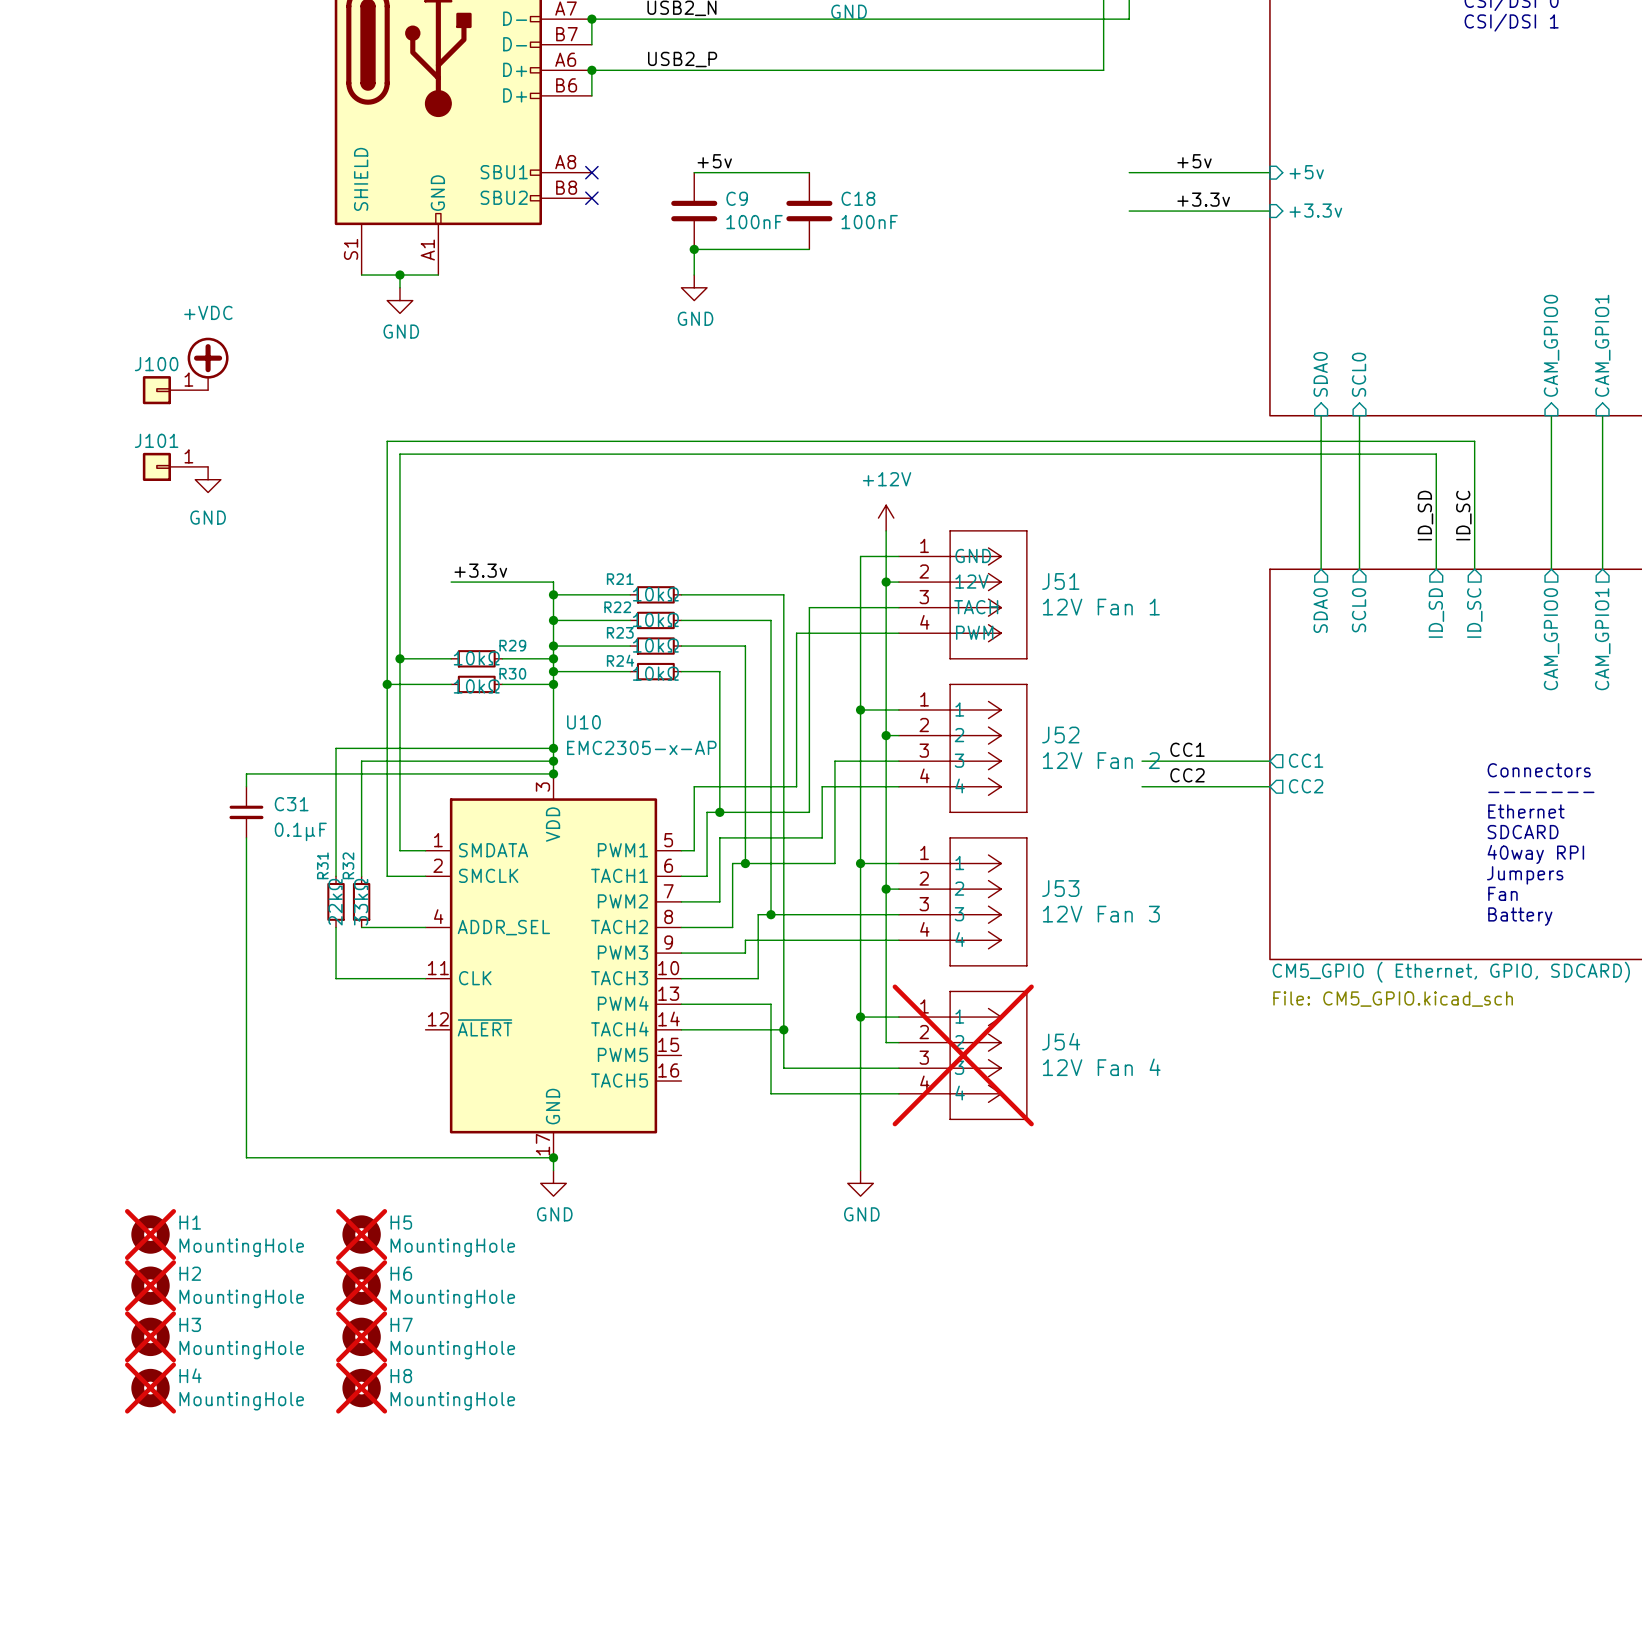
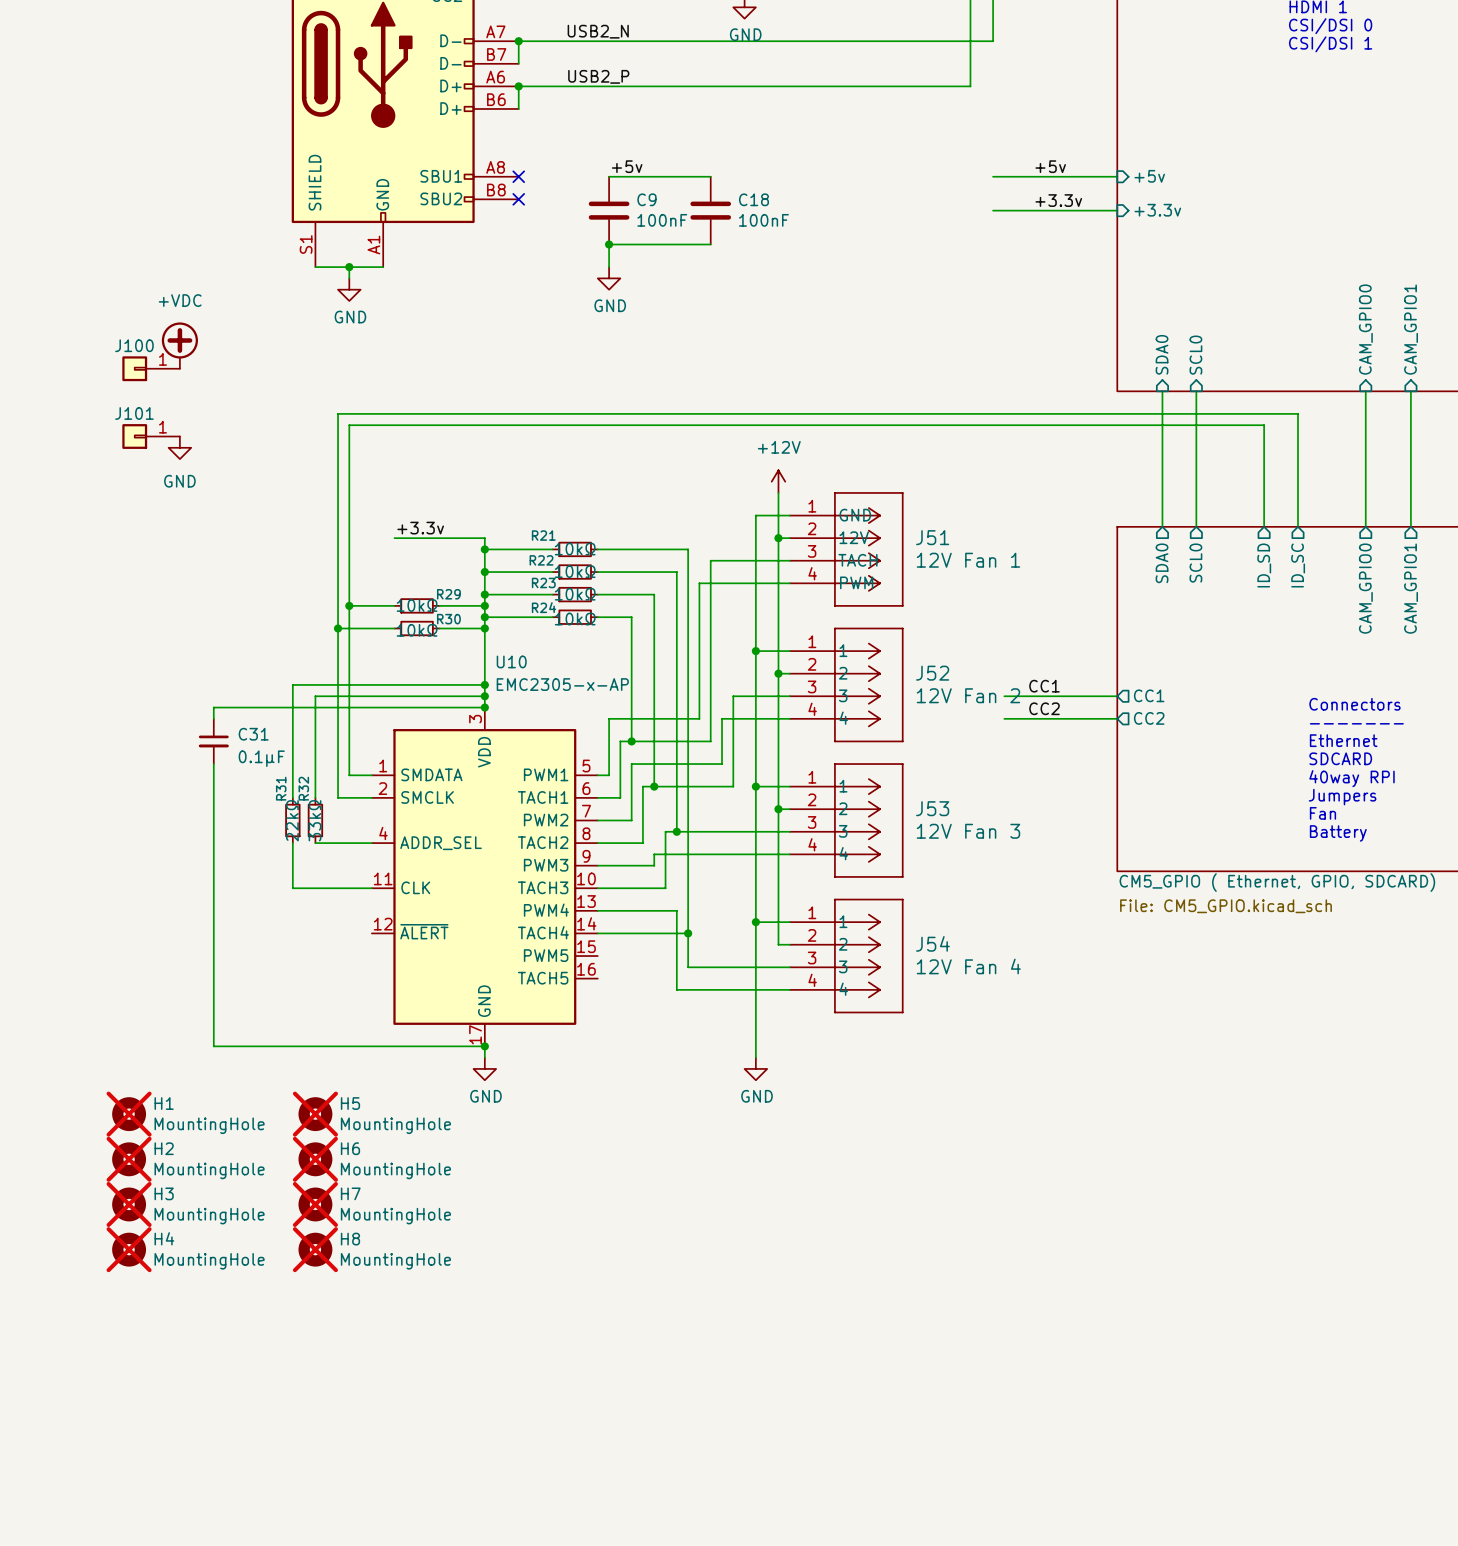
label: ID_SD (1425, 515) -> none
label: ID_SC (1463, 515) -> none
J54 do-not-place cross: (963, 1055) -> none

